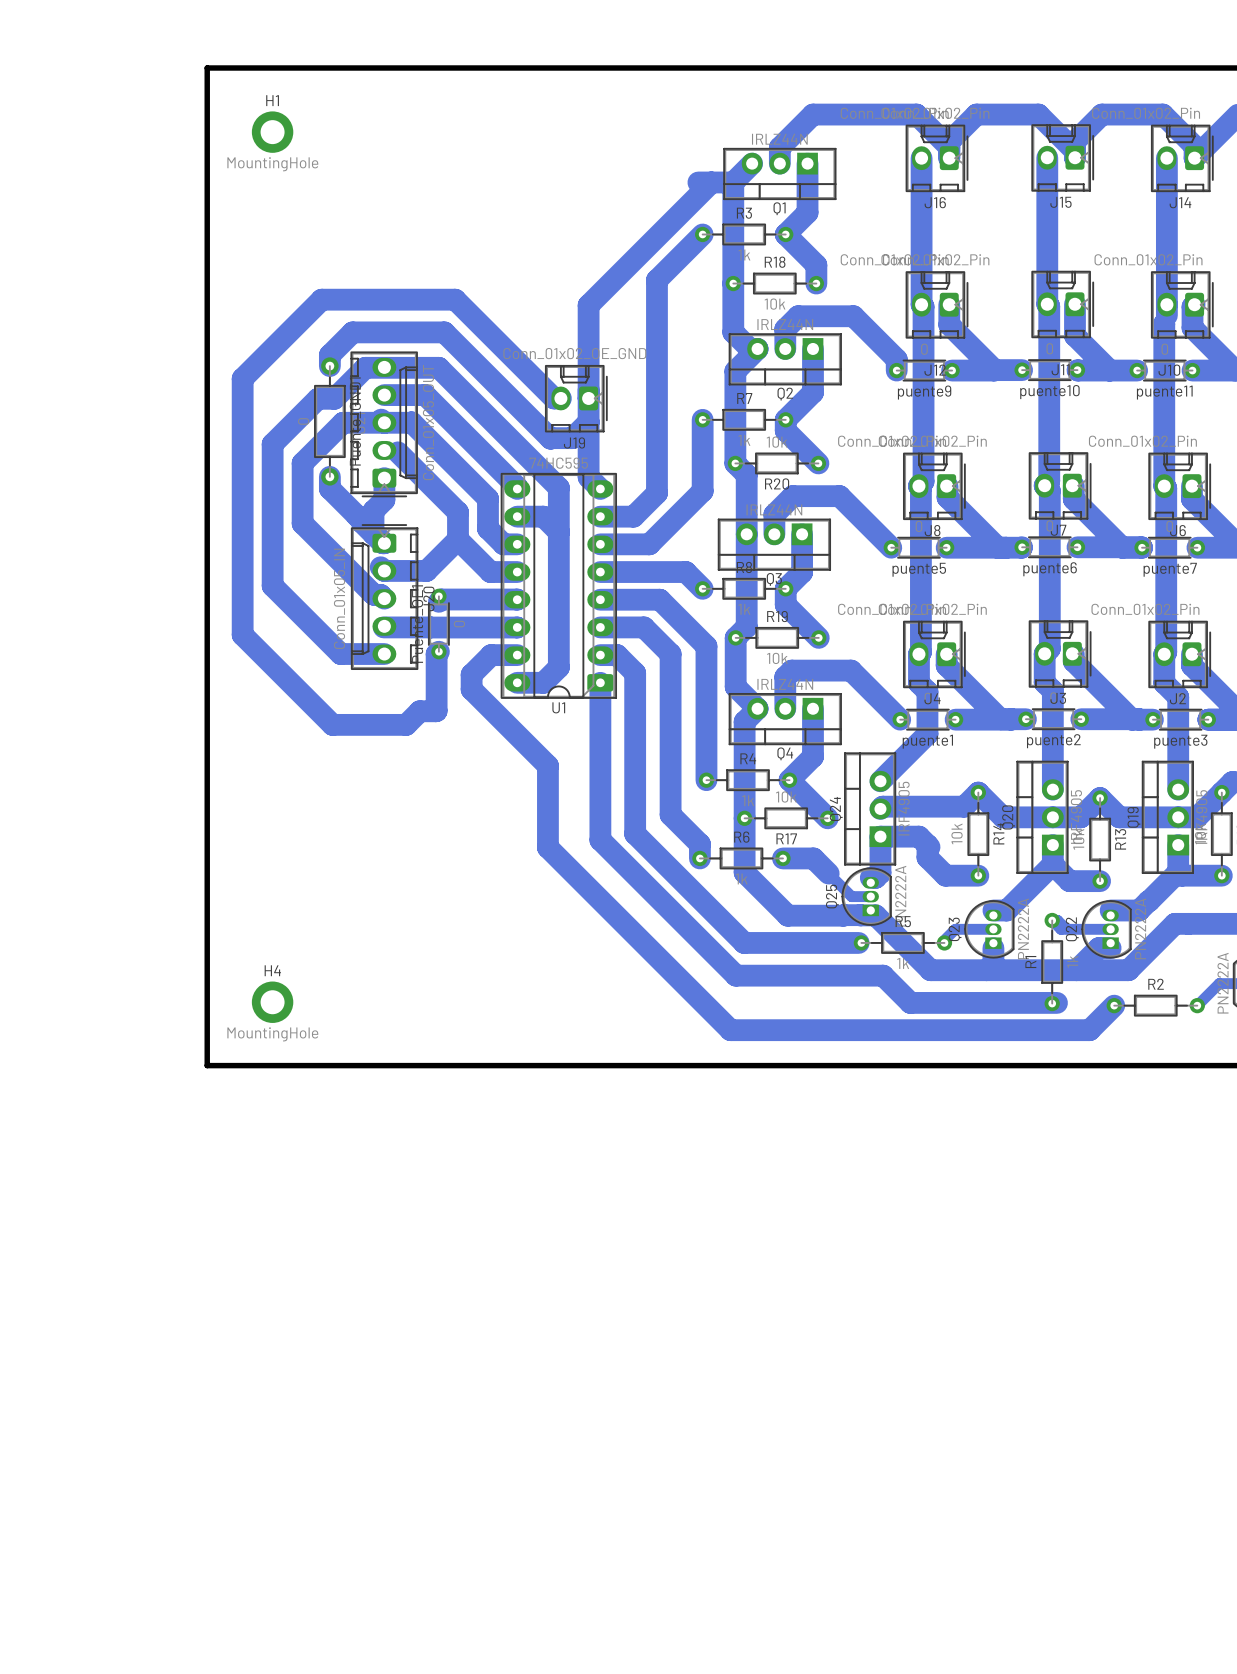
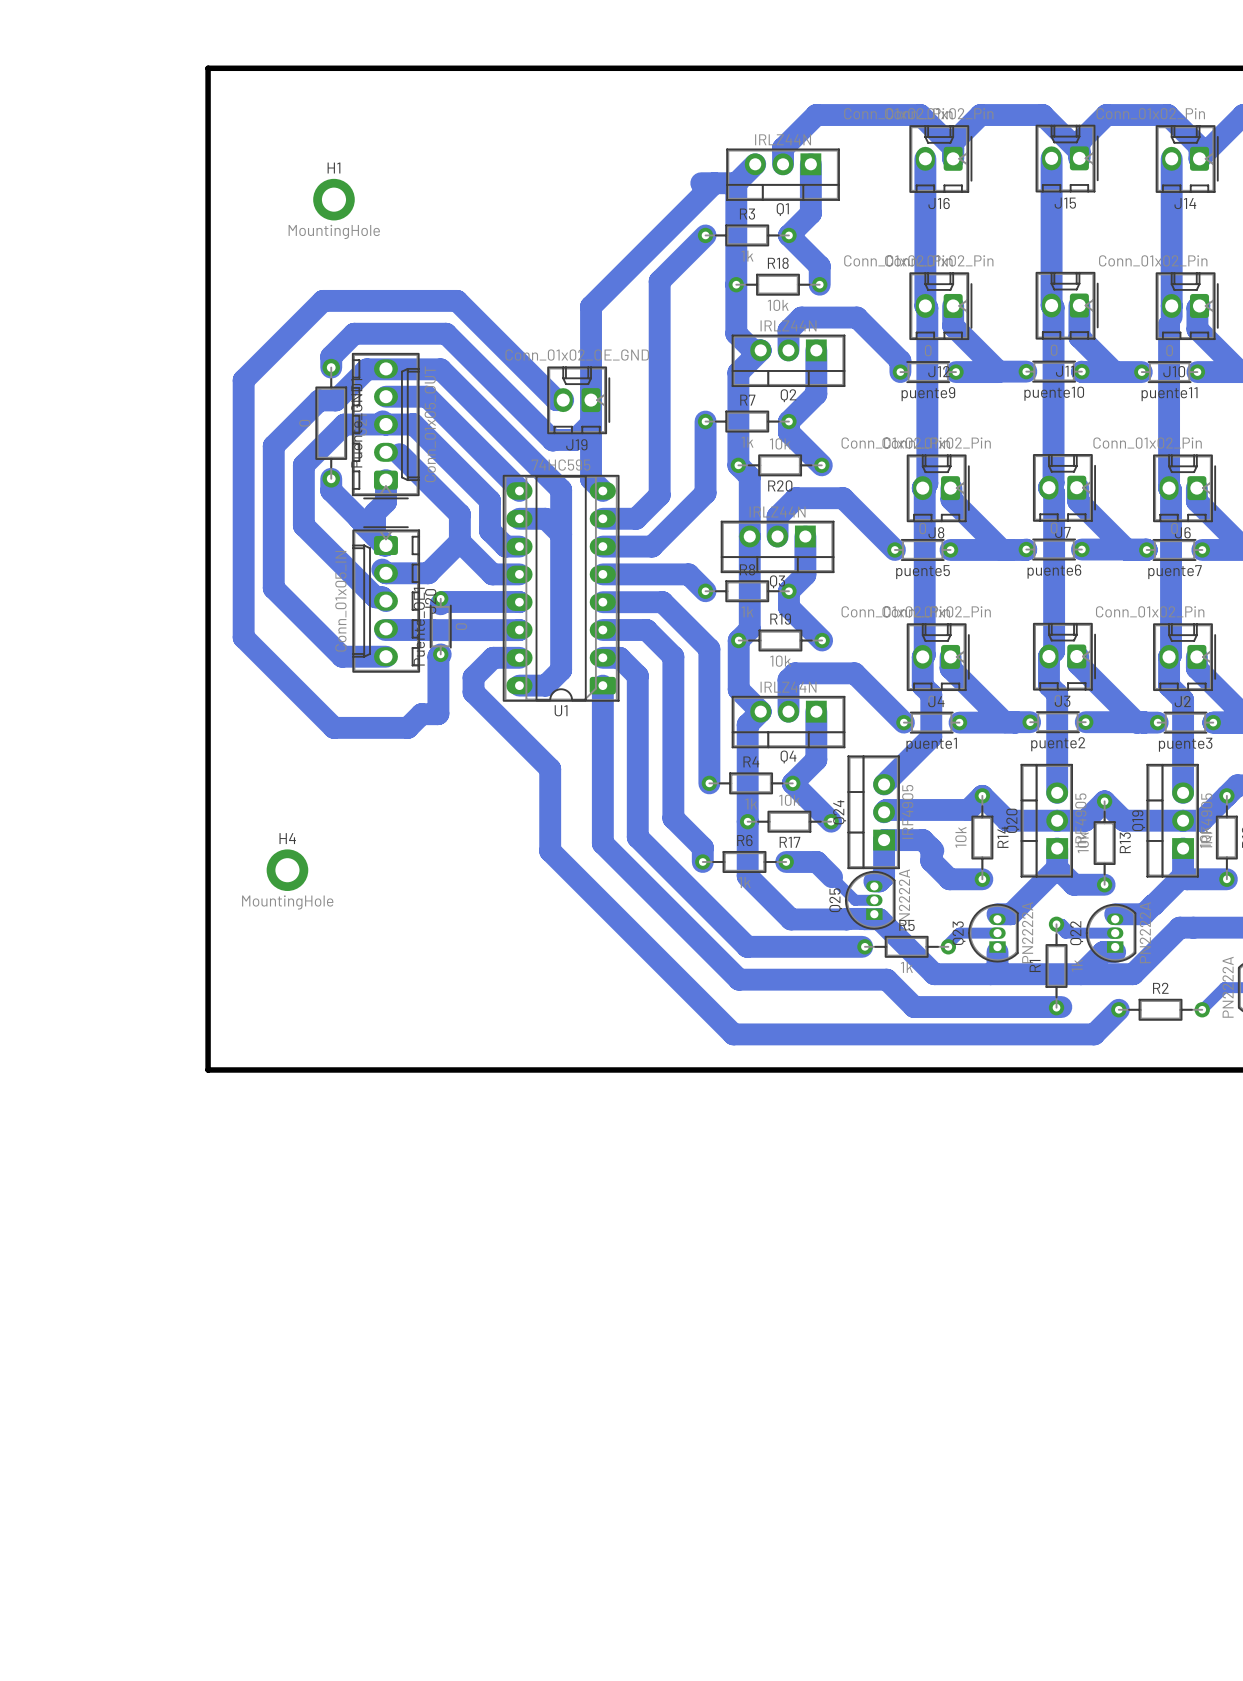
H1 position: (272, 132) -> (333, 199)
H4 position: (272, 1002) -> (287, 870)

